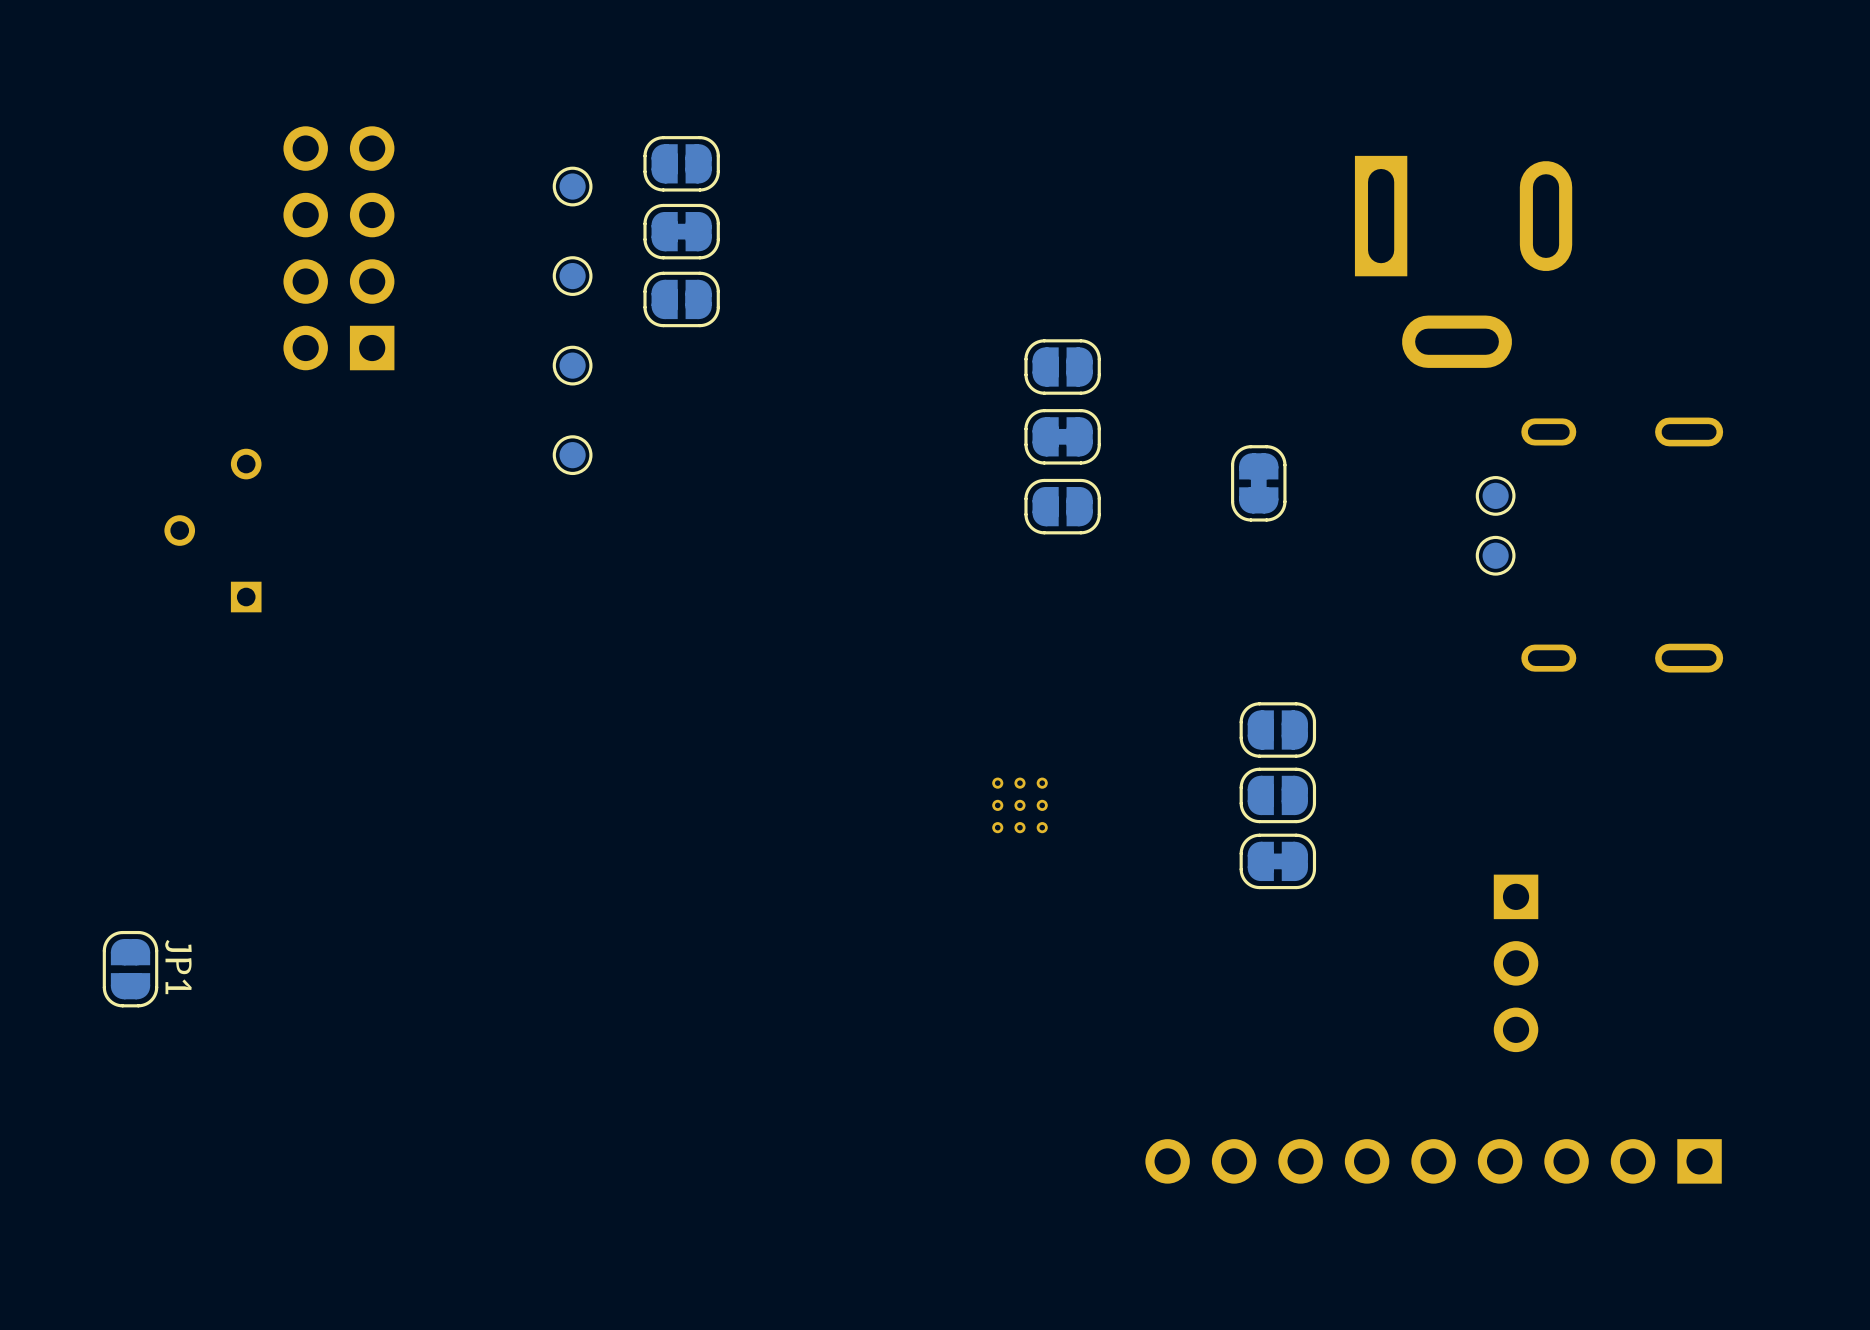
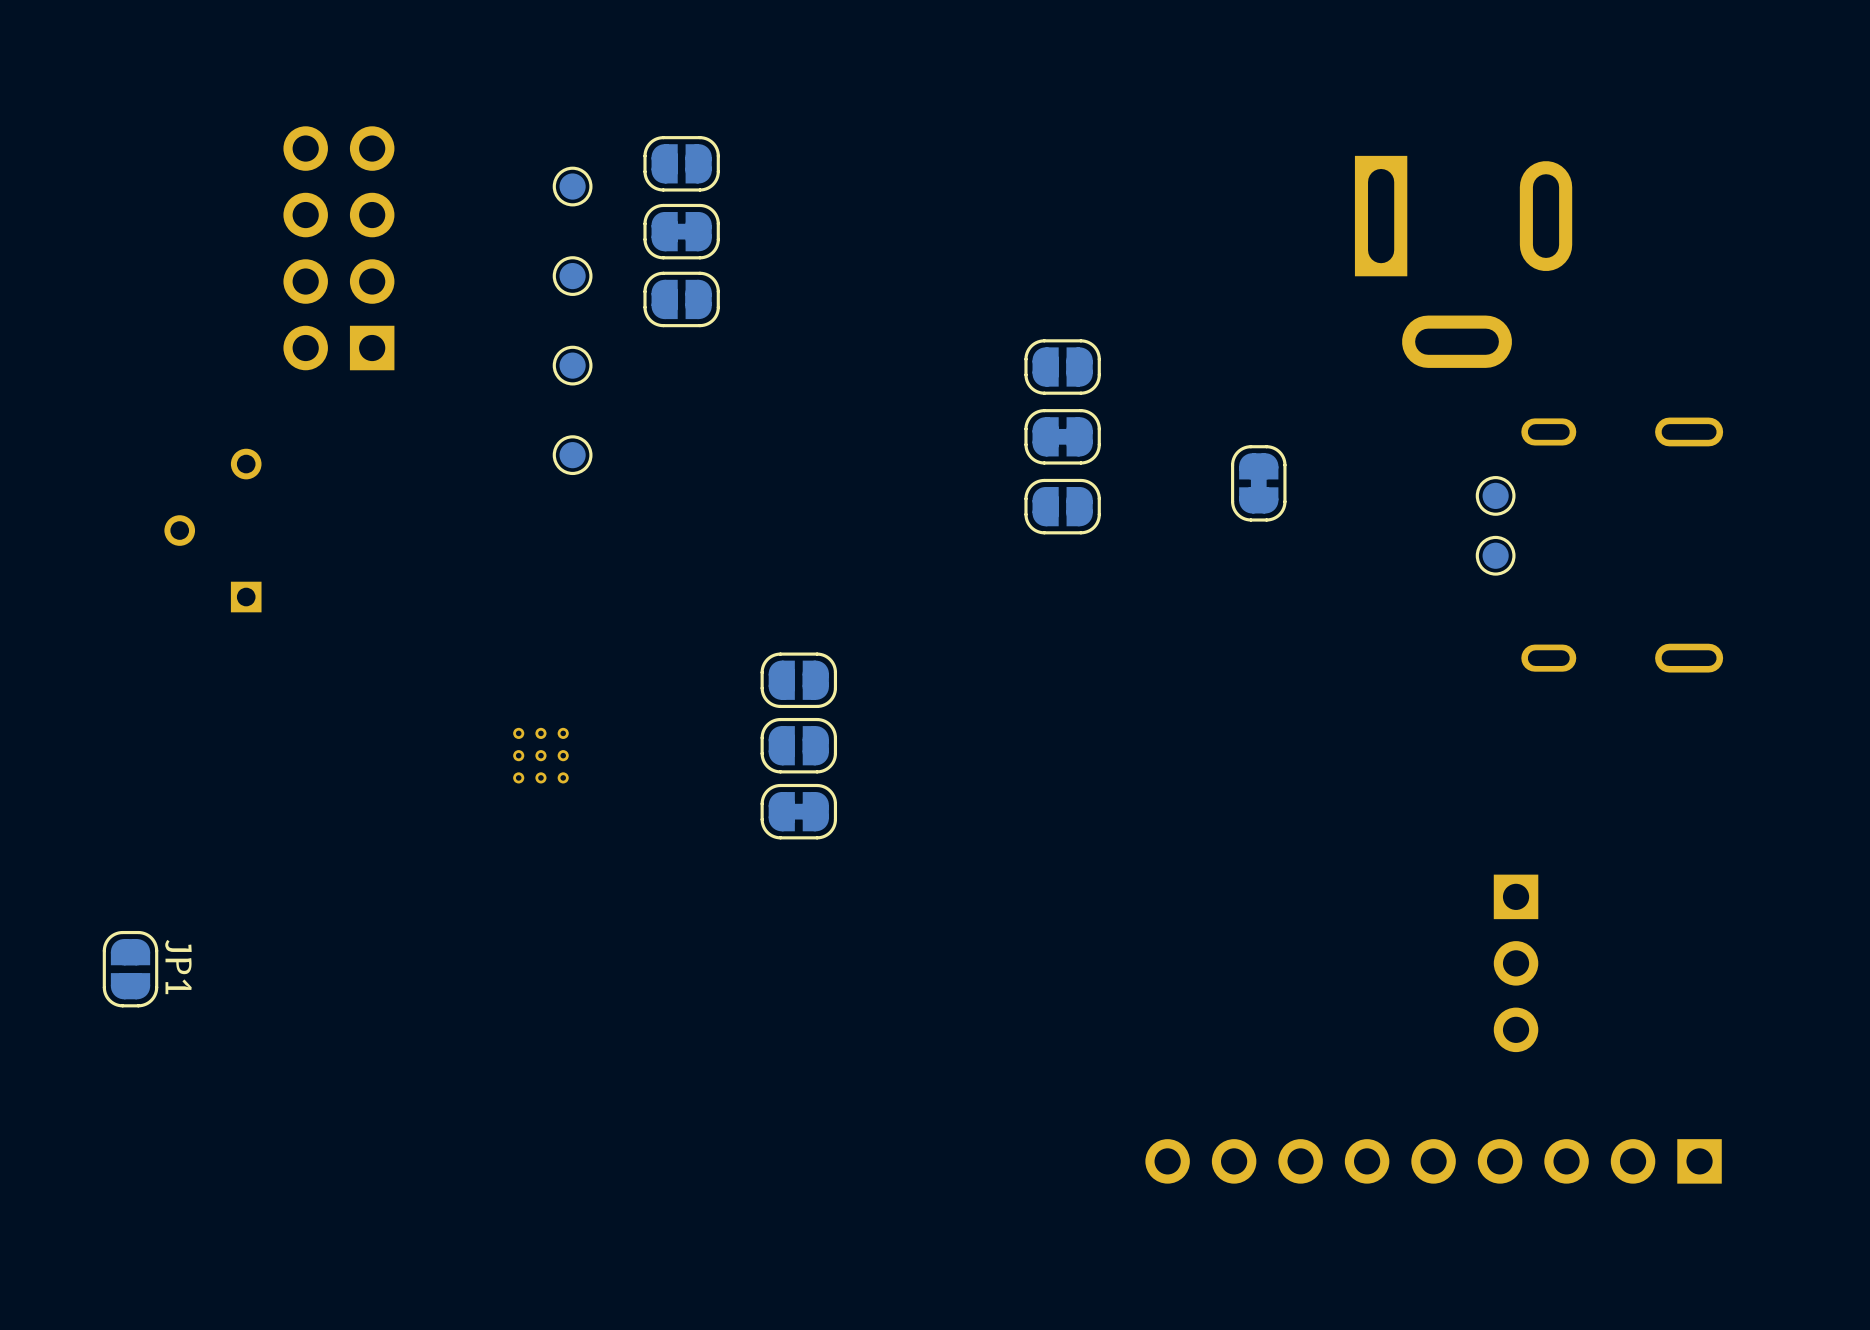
part: none -> (798, 680)
part: (1277, 730) -> none
part: none -> (798, 745)
part: (1277, 795) -> none
part position: (1019, 805) -> (540, 755)
part position: (1277, 861) -> (798, 811)

